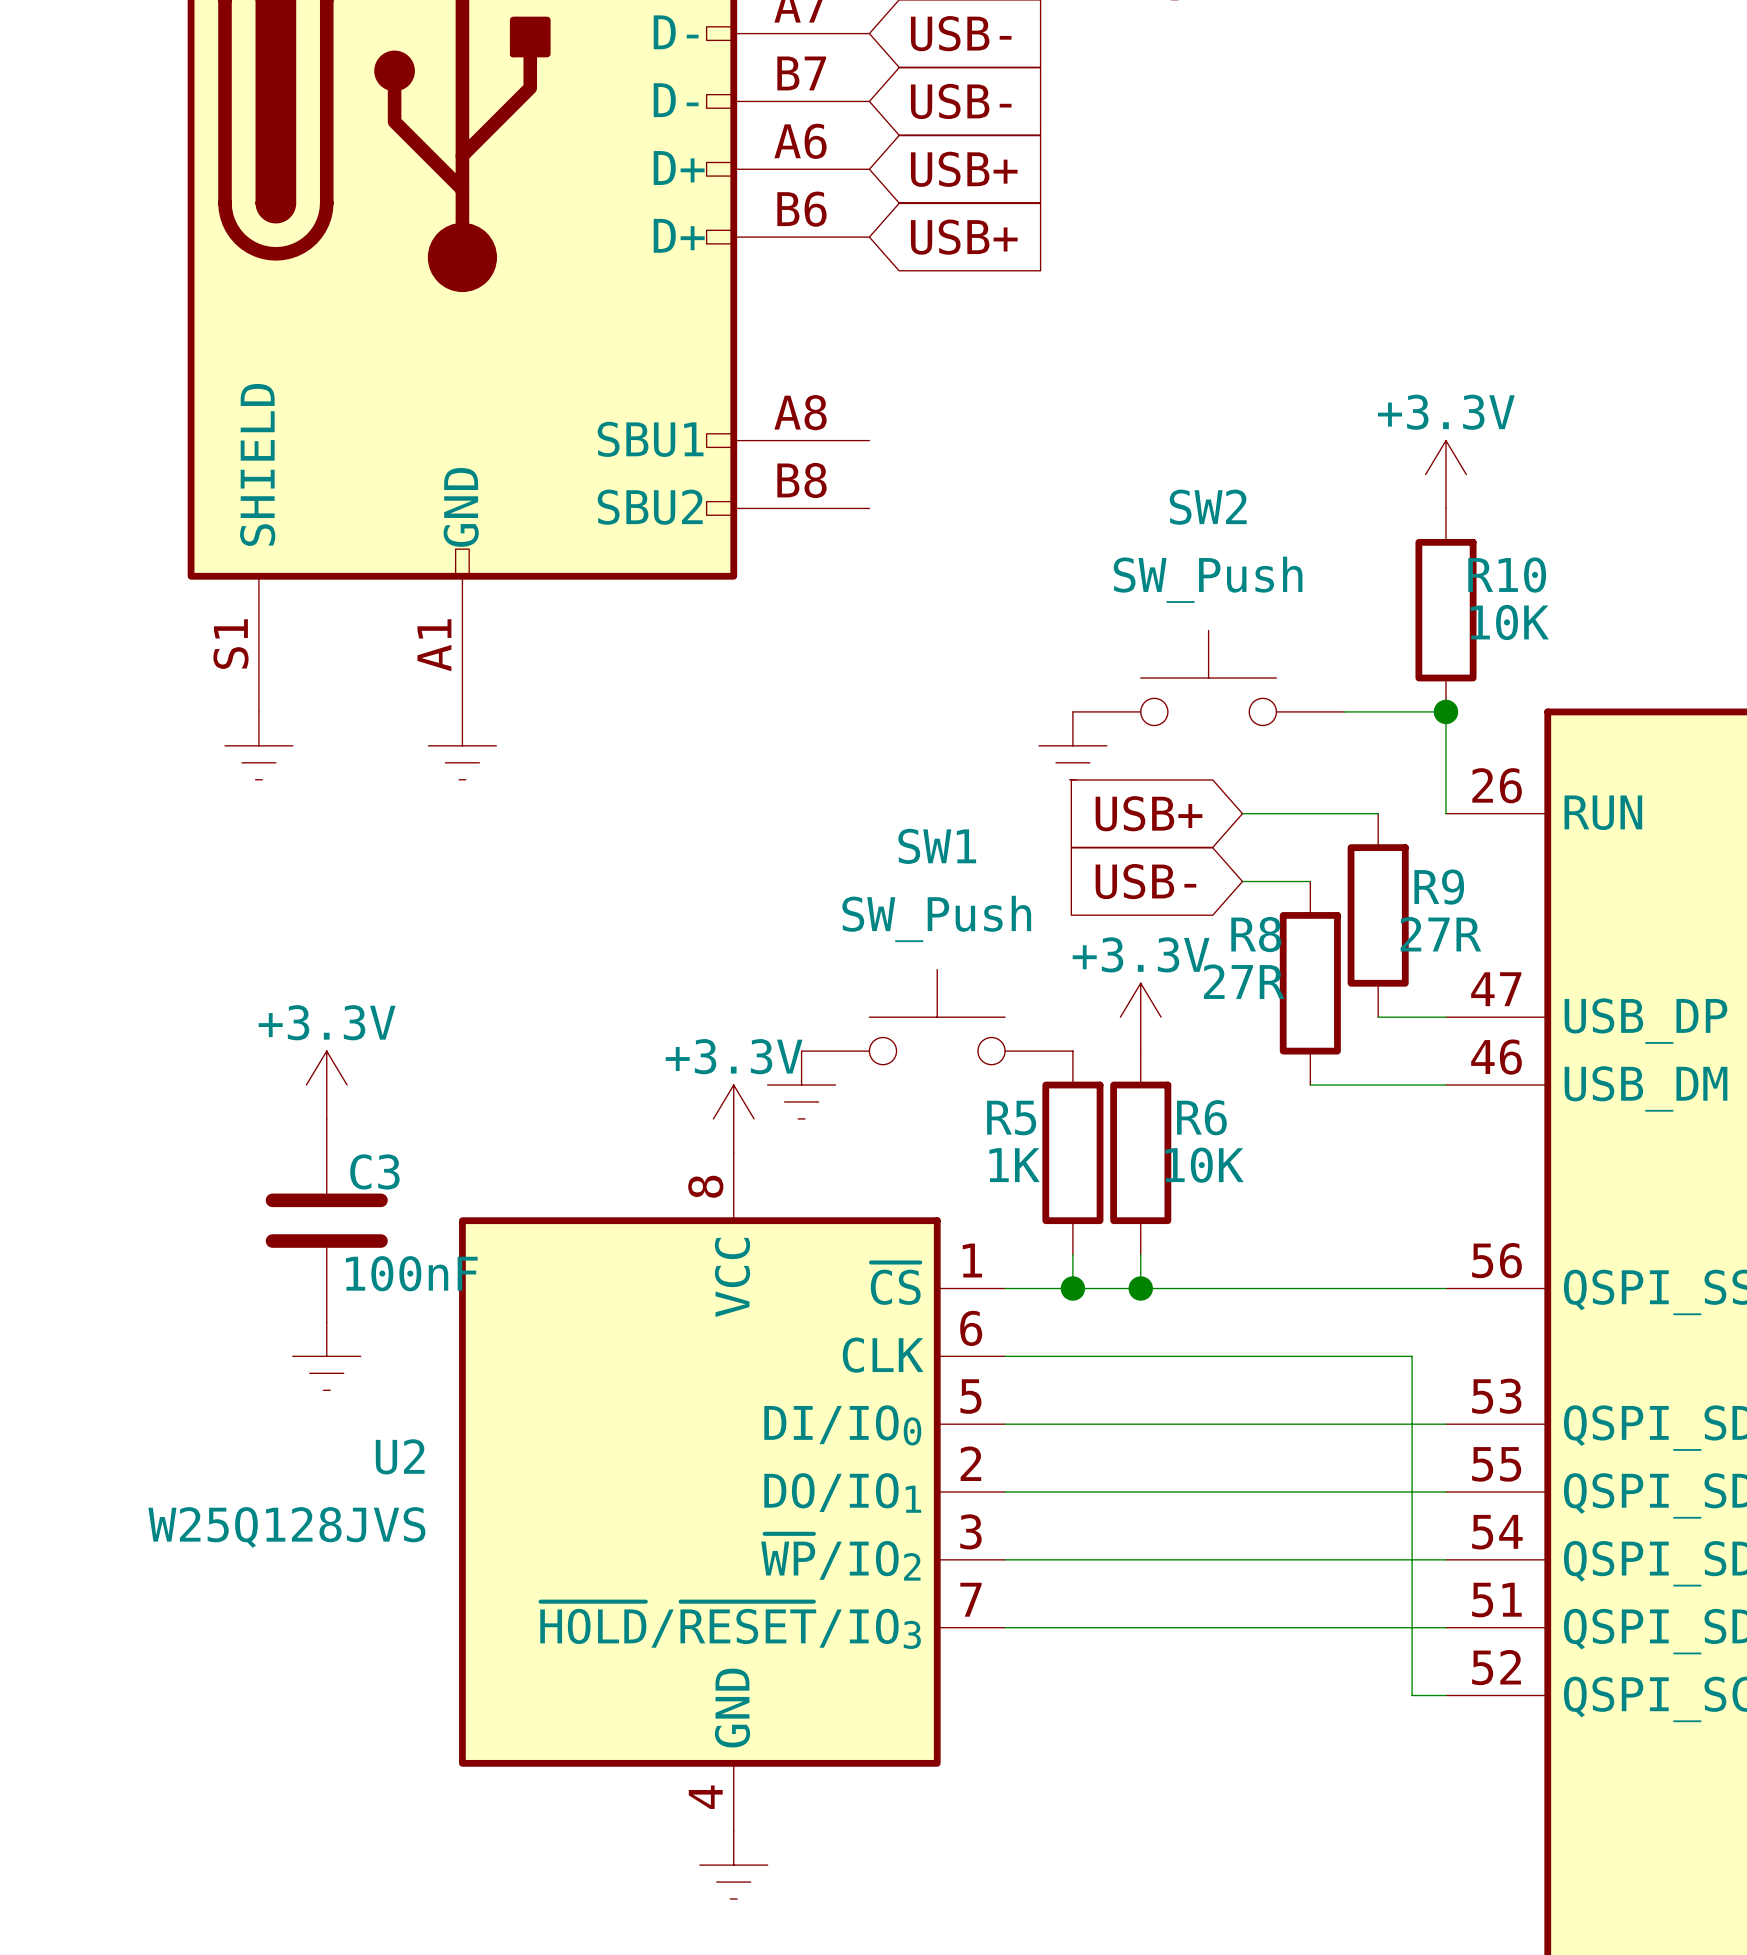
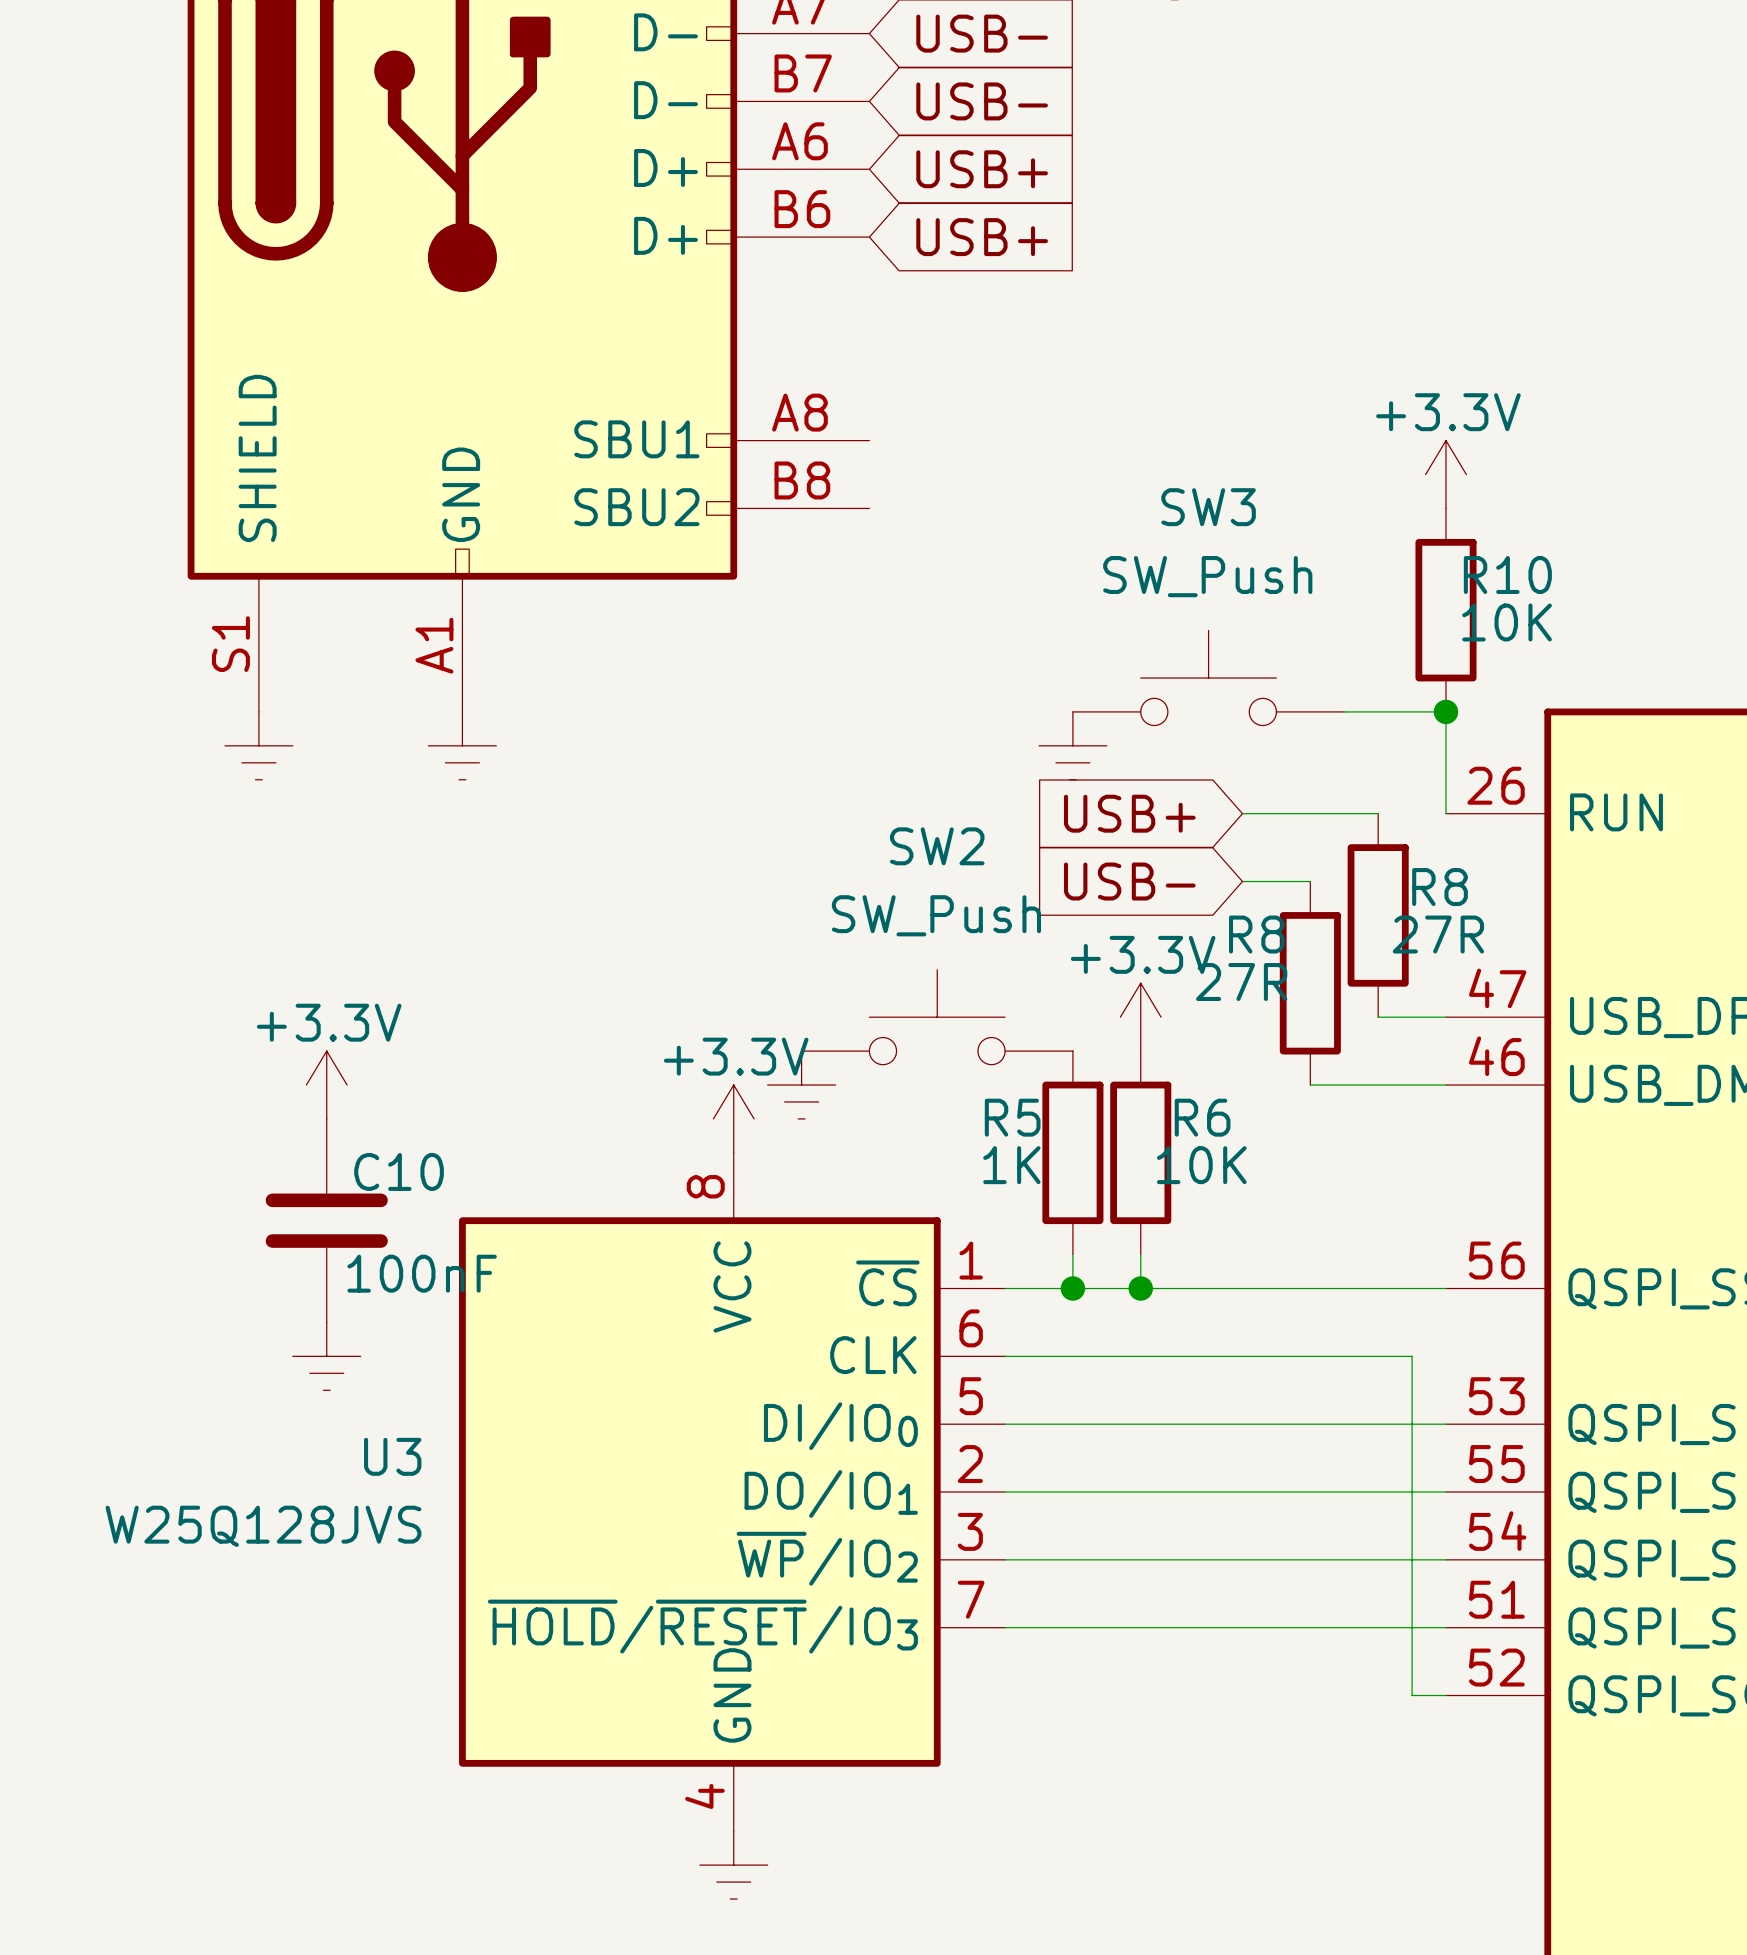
SW2 name: SW2 (1208, 507) -> SW3 (1208, 507)
SW1 name: SW1 (937, 846) -> SW2 (937, 846)
R9 name: R9 (1439, 887) -> R8 (1440, 887)
C3 name: C3 (374, 1171) -> C10 (399, 1171)
U2 name: U2 (400, 1456) -> U3 (392, 1456)

